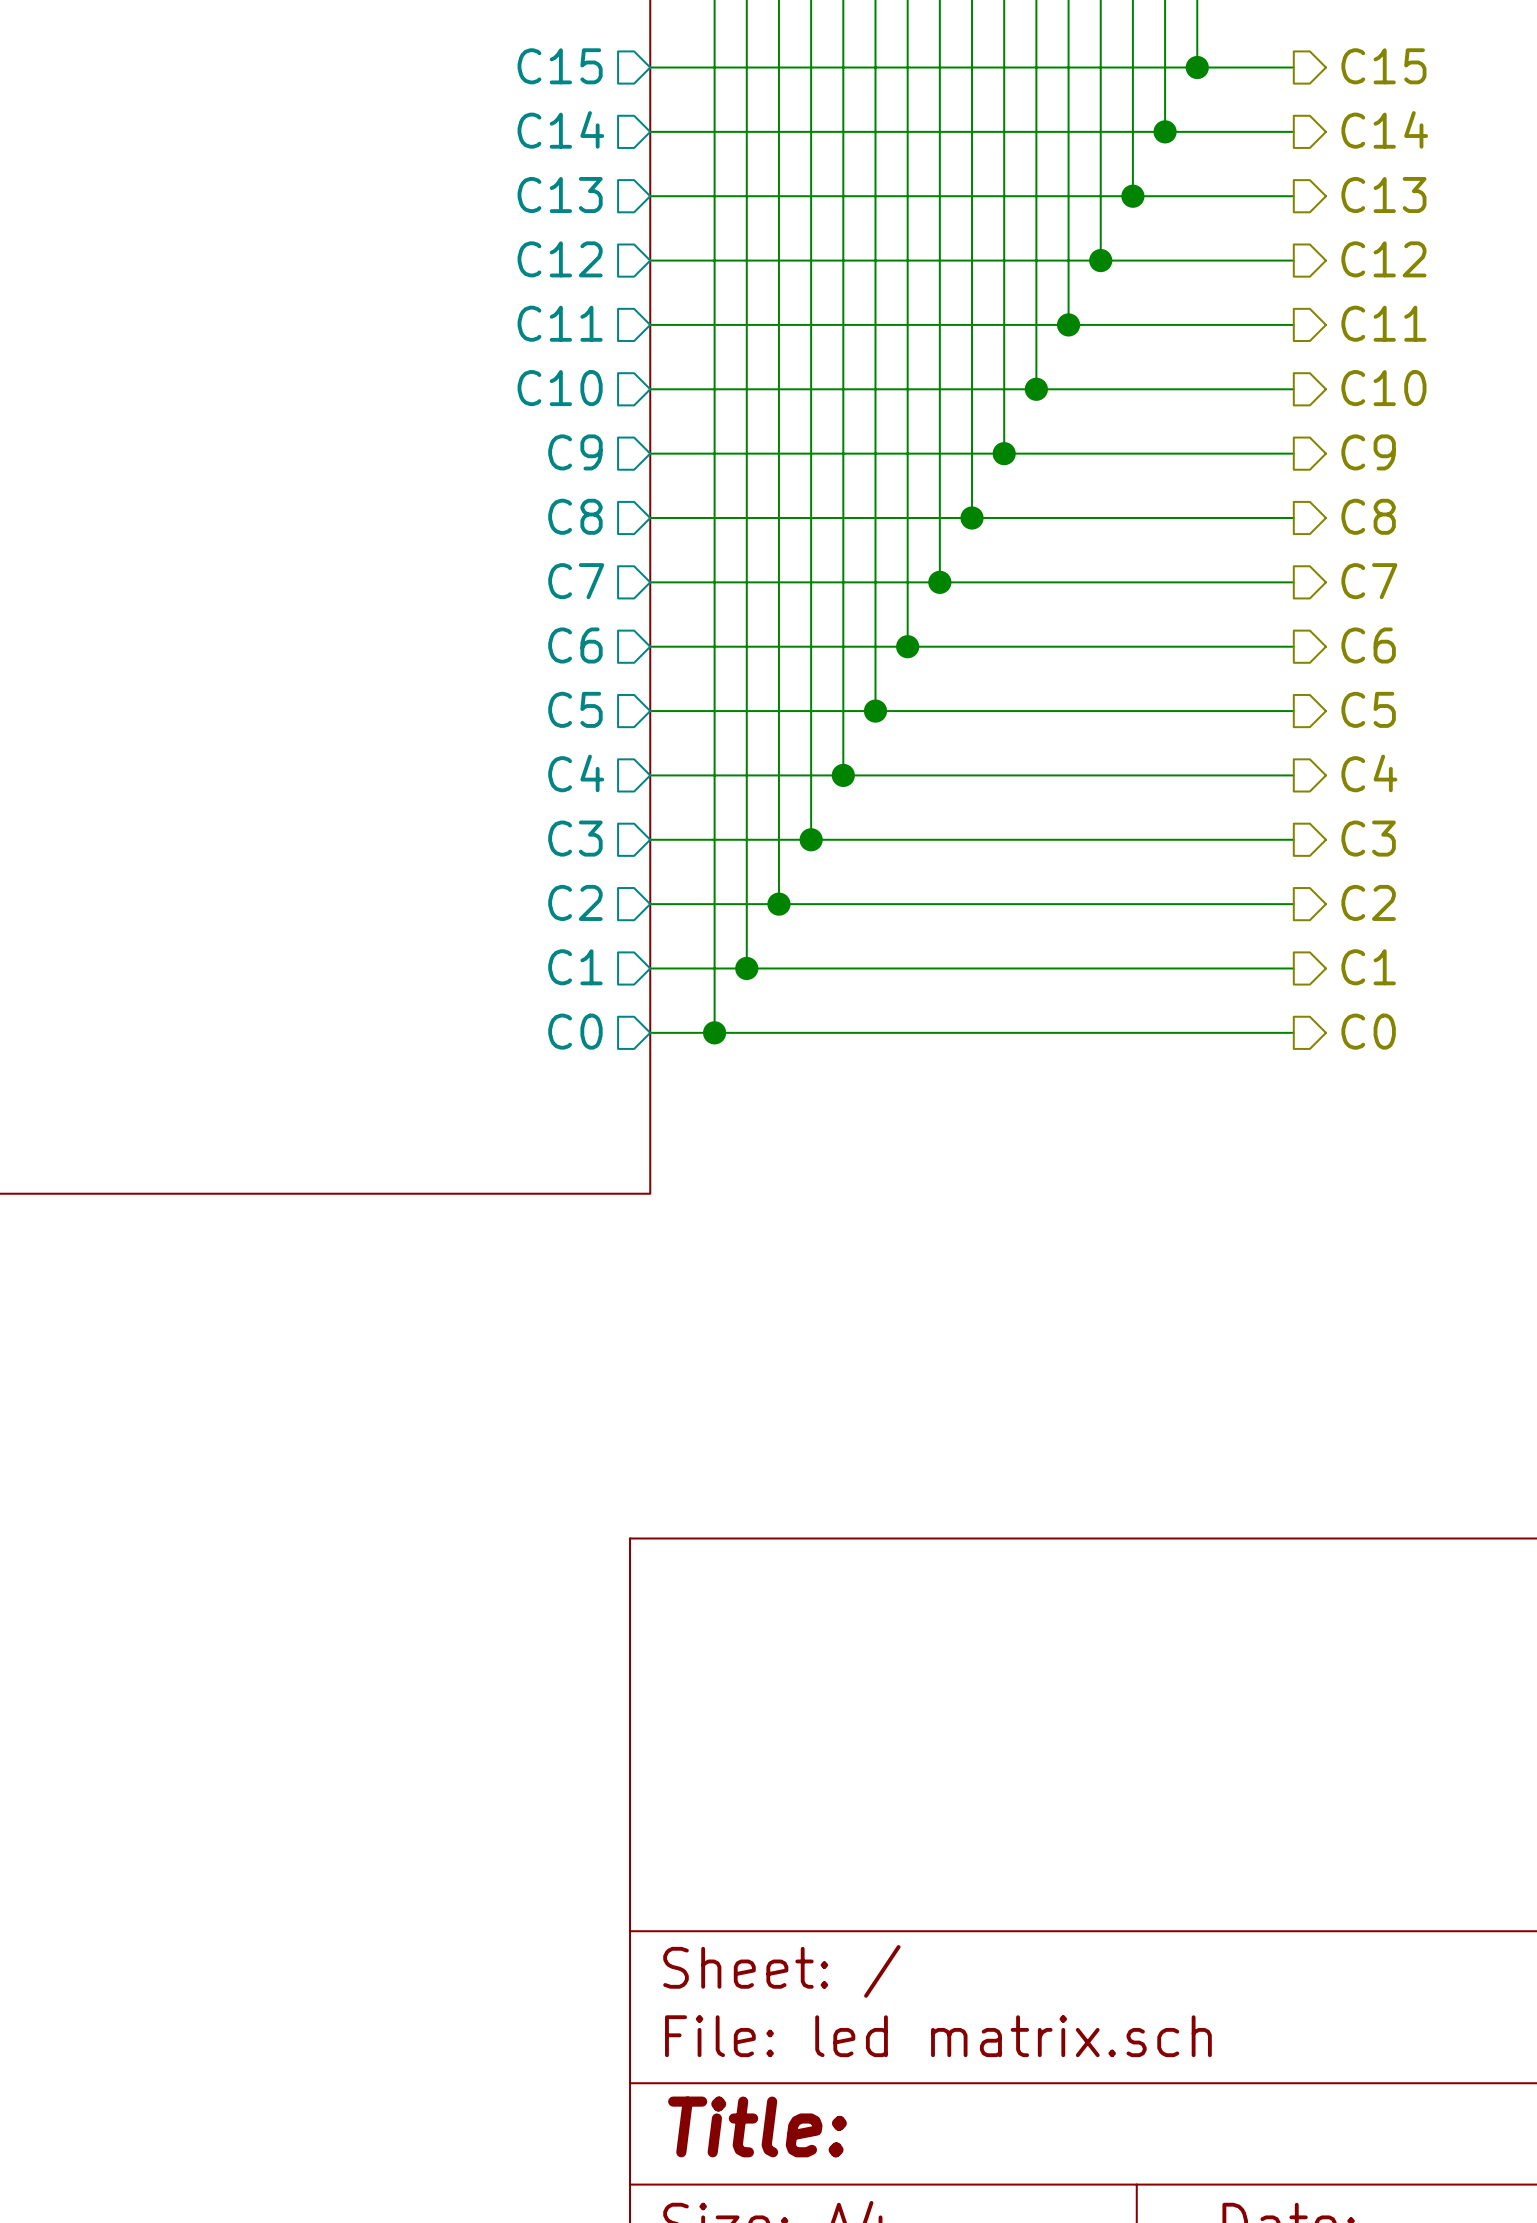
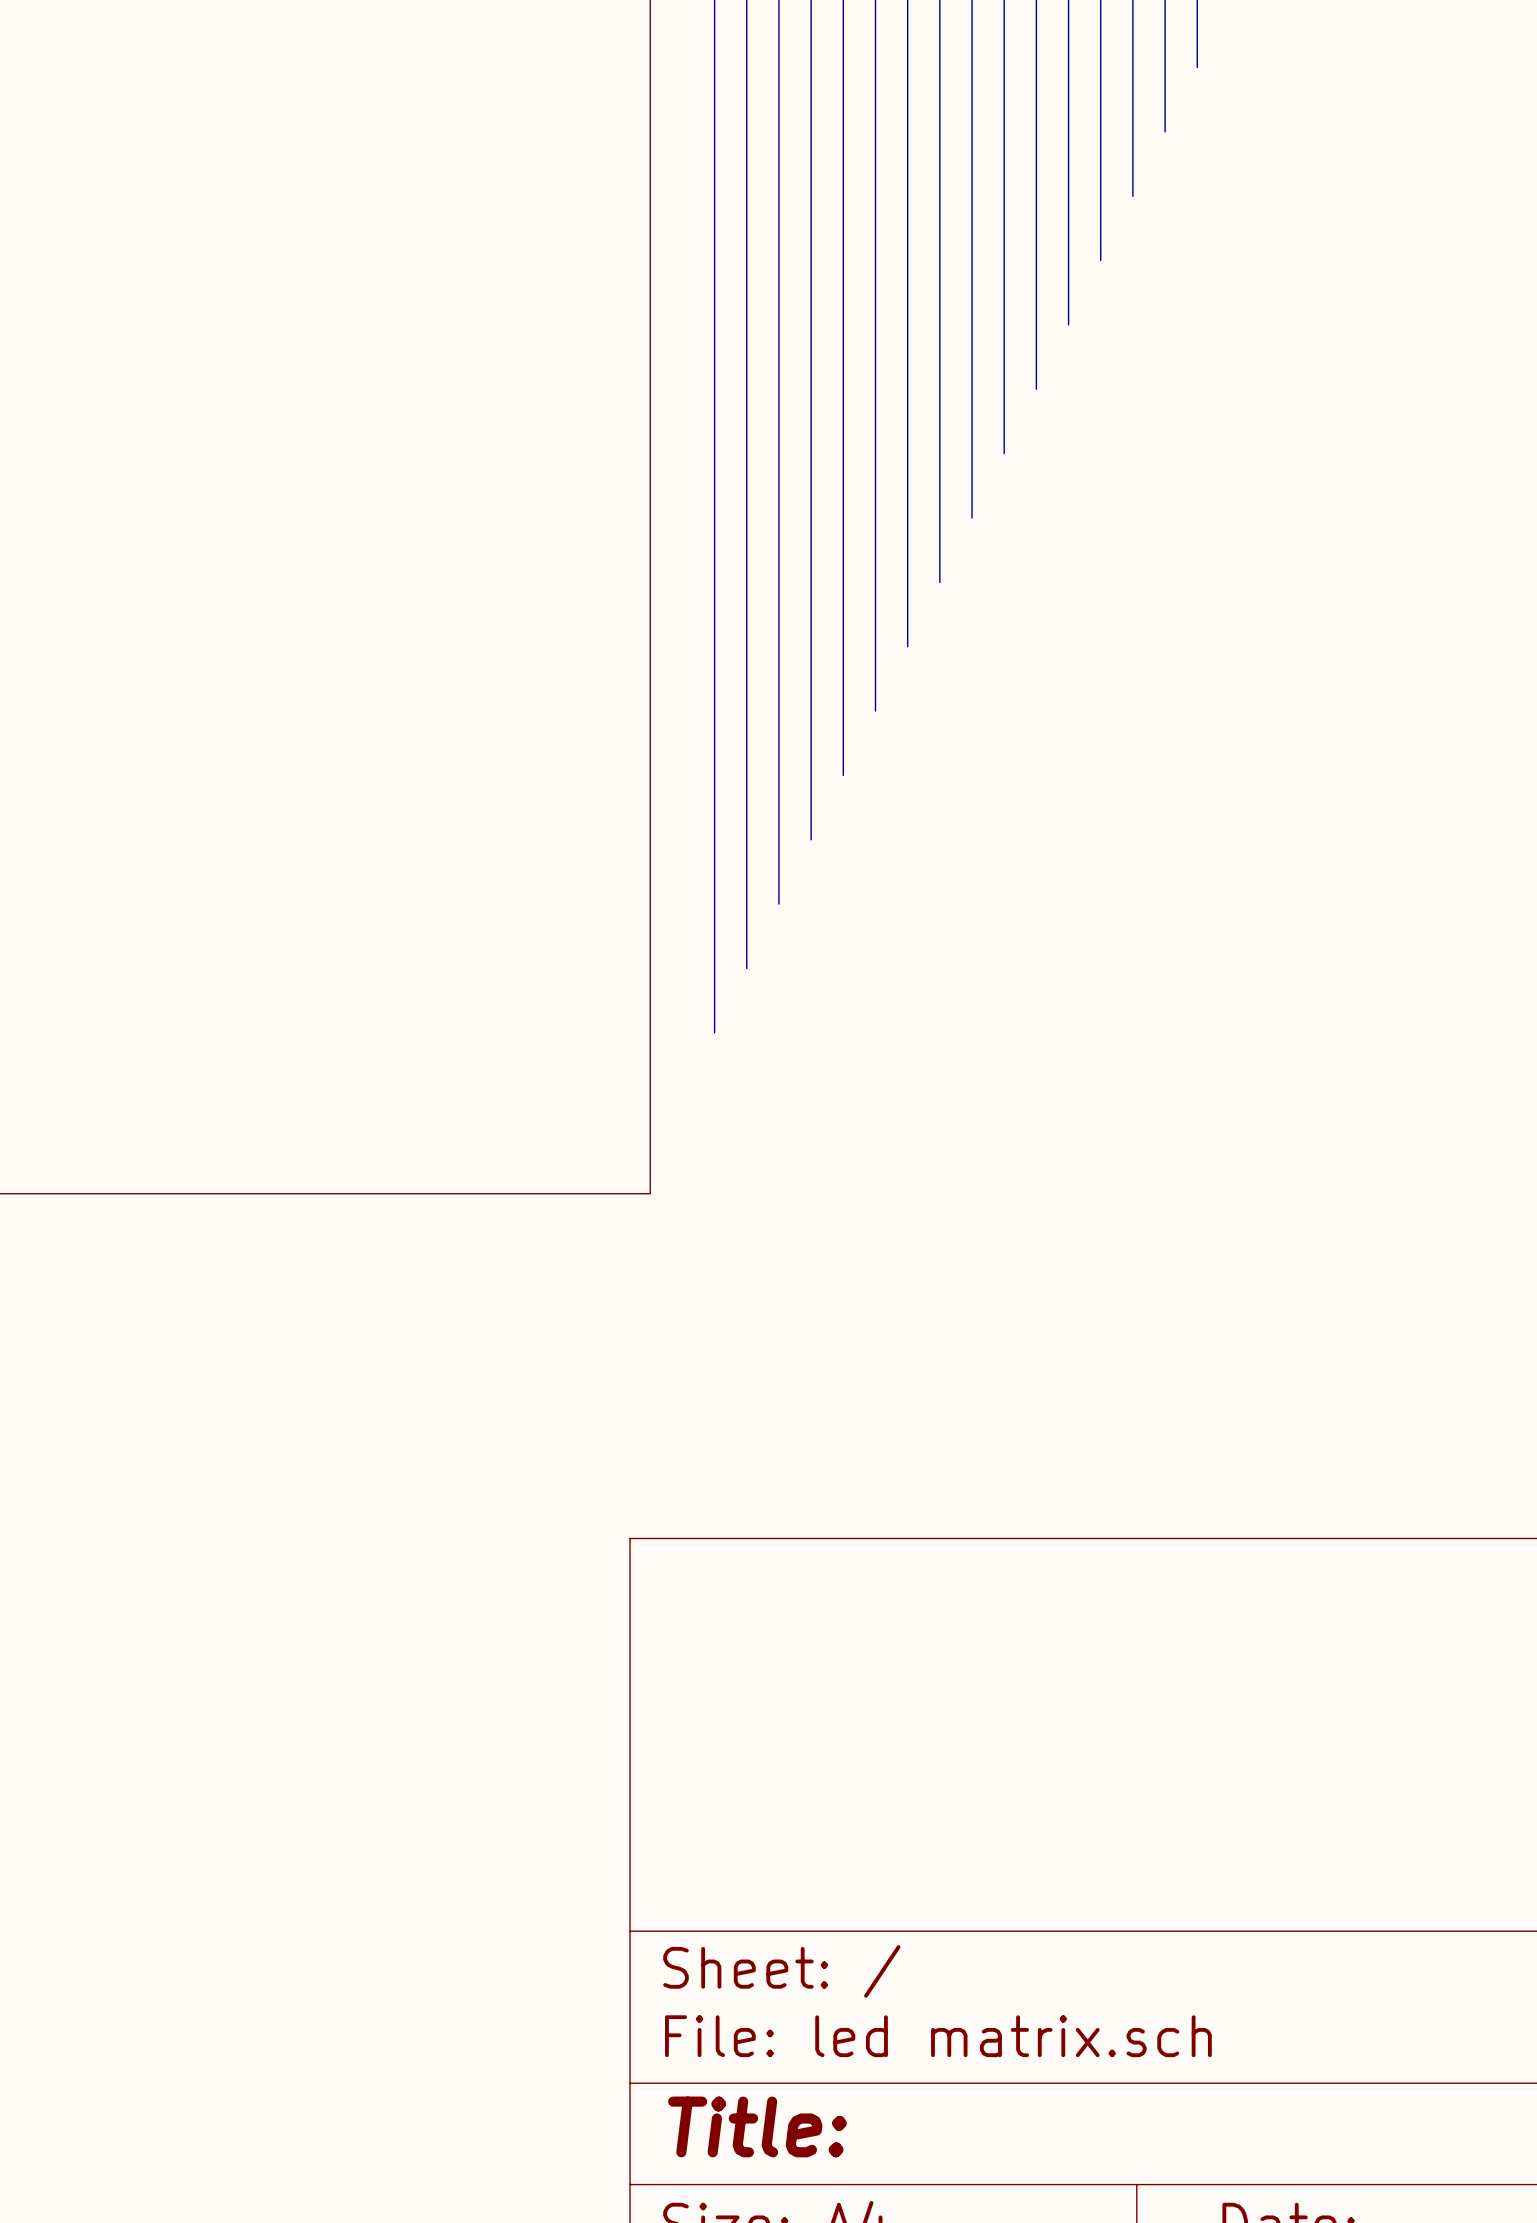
sheet pin: C15 (560, 66) -> none
hierarchical label: C15 (1383, 66) -> none
wire: (650, 67) (1293, 67) -> none
junction: (1197, 67) -> none
sheet pin: C14 (560, 129) -> none
hierarchical label: C14 (1384, 129) -> none
wire: (650, 131) (1293, 131) -> none
junction: (1165, 131) -> none
sheet pin: C13 (560, 195) -> none
hierarchical label: C13 (1383, 195) -> none
wire: (650, 196) (1293, 196) -> none
junction: (1132, 196) -> none
sheet pin: C12 (560, 259) -> none
hierarchical label: C12 (1383, 259) -> none
wire: (650, 260) (1293, 260) -> none
junction: (1100, 260) -> none
sheet pin: C11 (560, 323) -> none
hierarchical label: C11 (1383, 323) -> none
wire: (650, 324) (1293, 324) -> none
junction: (1068, 324) -> none
sheet pin: C10 (560, 388) -> none
hierarchical label: C10 (1383, 388) -> none
wire: (650, 389) (1293, 389) -> none
junction: (1036, 389) -> none
sheet pin: C9 (575, 452) -> none
hierarchical label: C9 (1368, 452) -> none
wire: (650, 453) (1293, 453) -> none
junction: (1004, 453) -> none
sheet pin: C8 (575, 516) -> none
hierarchical label: C8 (1368, 516) -> none
wire: (650, 518) (1293, 518) -> none
junction: (972, 518) -> none
sheet pin: C7 (576, 581) -> none
hierarchical label: C7 (1369, 581) -> none
wire: (650, 582) (1293, 582) -> none
junction: (939, 582) -> none
sheet pin: C6 (575, 645) -> none
hierarchical label: C6 (1368, 645) -> none
wire: (650, 646) (1293, 646) -> none
junction: (907, 646) -> none
sheet pin: C5 (575, 709) -> none
hierarchical label: C5 (1368, 709) -> none
wire: (650, 711) (1293, 711) -> none
junction: (875, 711) -> none
sheet pin: C4 (576, 773) -> none
hierarchical label: C4 (1369, 773) -> none
wire: (650, 775) (1293, 775) -> none
junction: (843, 775) -> none
sheet pin: C3 (575, 838) -> none
hierarchical label: C3 (1368, 838) -> none
wire: (650, 839) (1293, 839) -> none
junction: (811, 839) -> none
sheet pin: C2 (575, 902) -> none
hierarchical label: C2 (1368, 902) -> none
wire: (650, 904) (1293, 904) -> none
junction: (778, 904) -> none
sheet pin: C1 (575, 967) -> none
hierarchical label: C1 (1368, 967) -> none
wire: (650, 968) (1293, 968) -> none
junction: (746, 968) -> none
sheet pin: C0 (575, 1031) -> none
hierarchical label: C0 (1368, 1031) -> none
wire: (650, 1032) (1293, 1032) -> none
junction: (714, 1032) -> none

